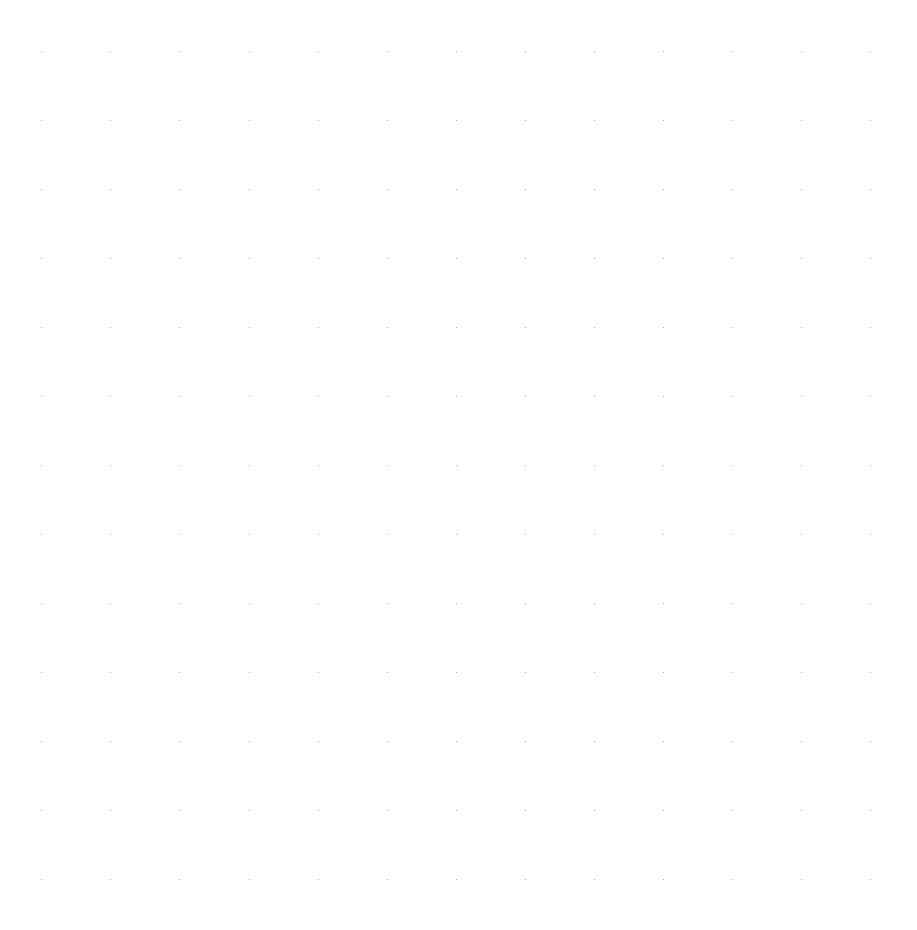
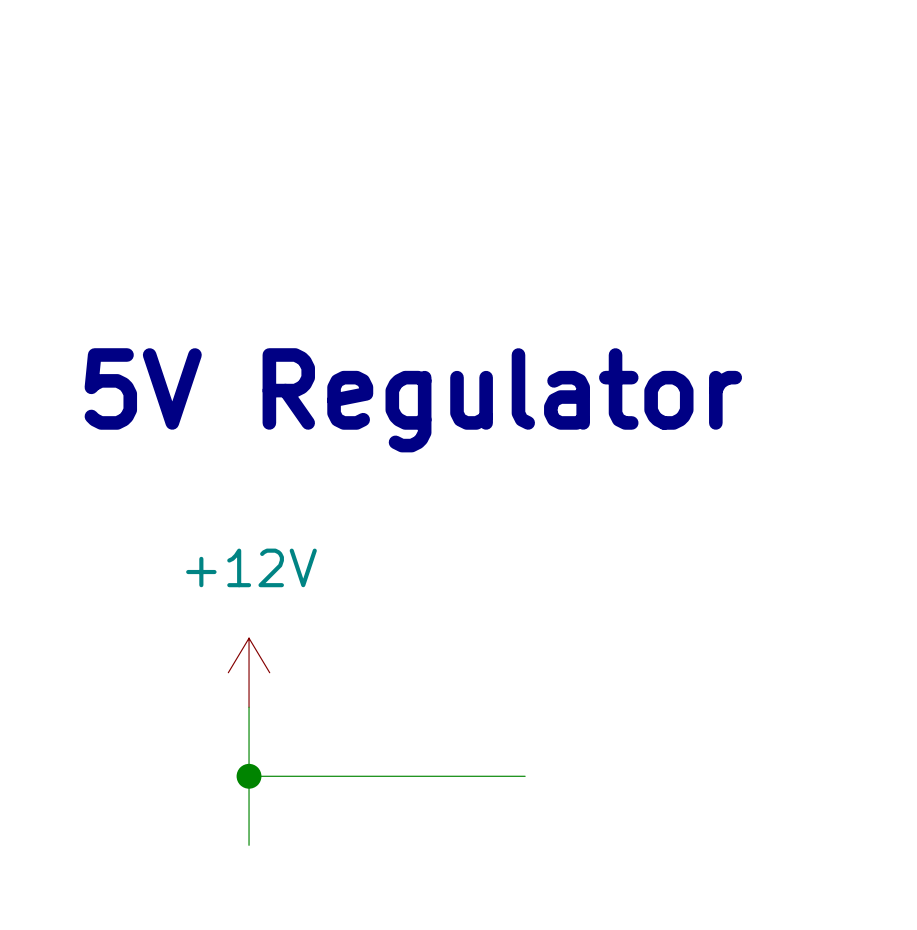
text: none -> 5V Regulator (413, 400)
power symbol: none -> +12V (249, 672)
wire: none -> (249, 707) (249, 845)
wire: none -> (249, 776) (525, 776)
junction: none -> (249, 776)

